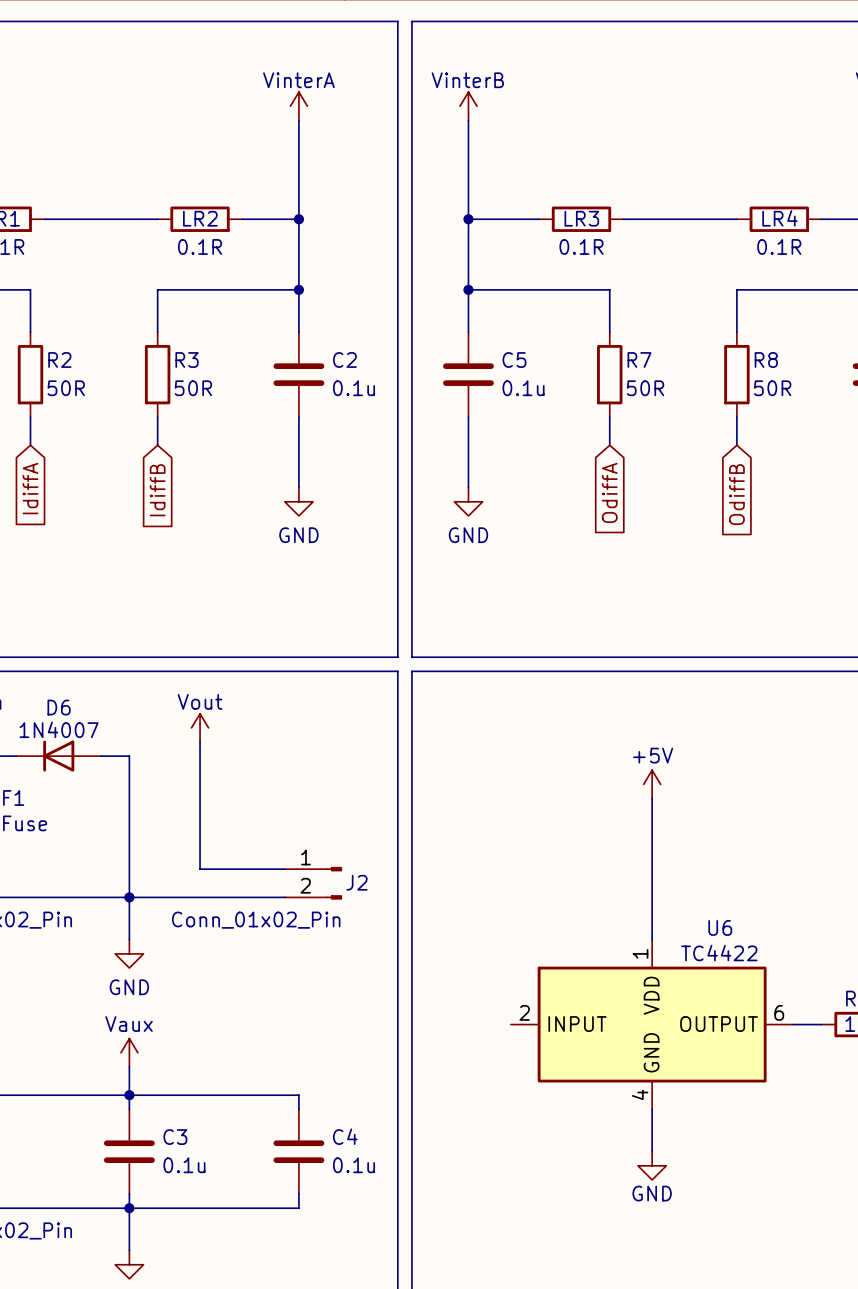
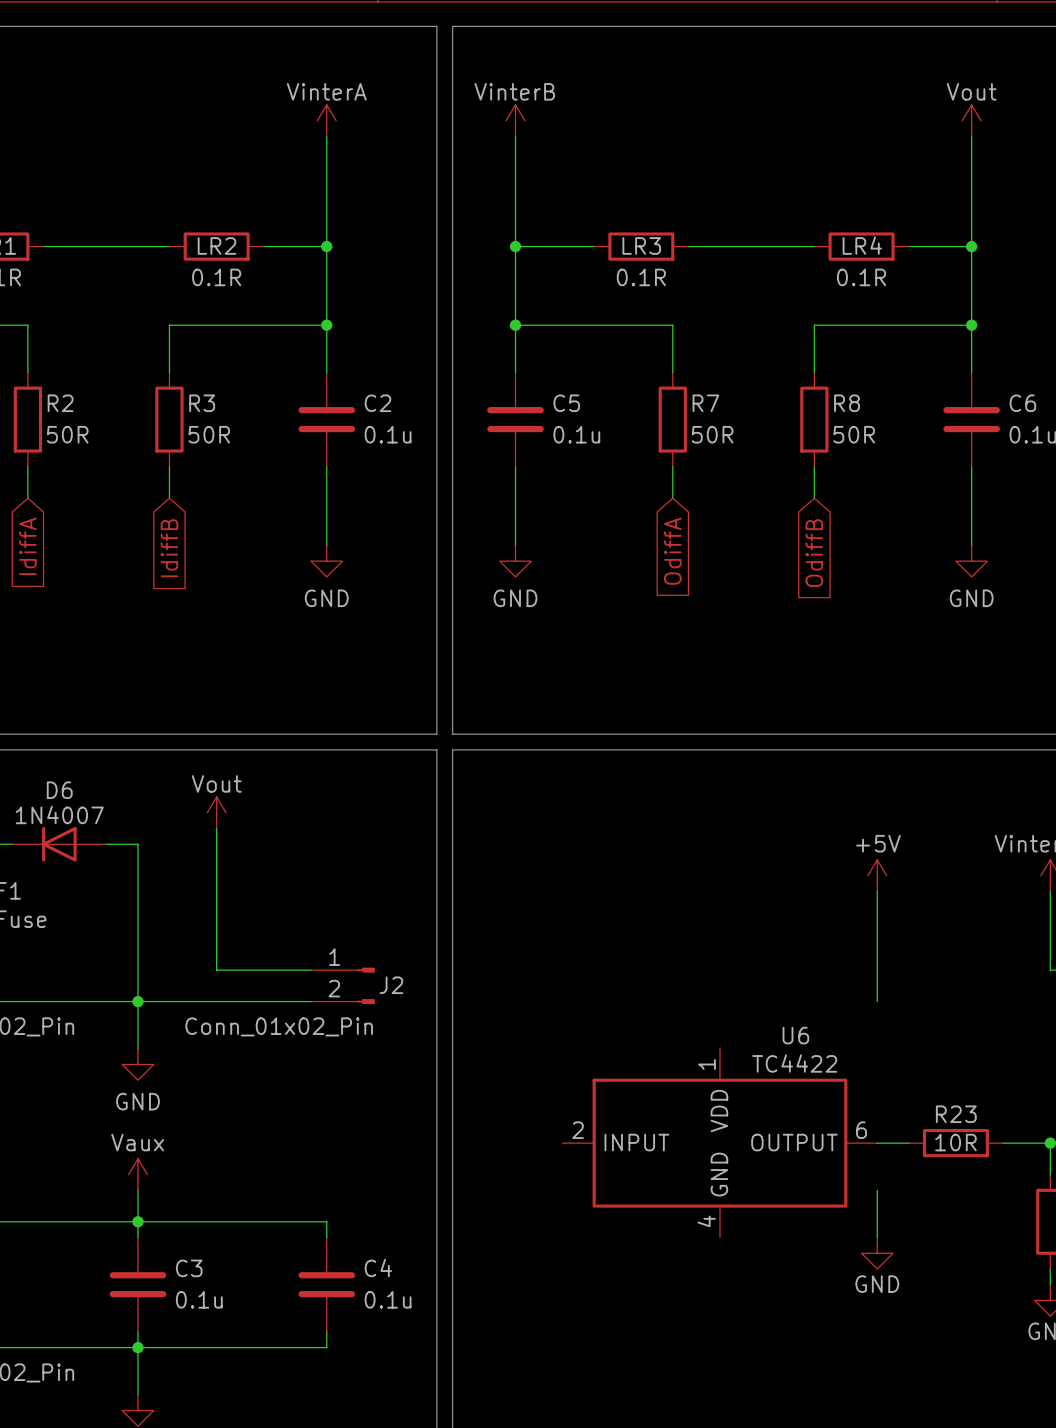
power symbol position: +5V (652, 784) -> +5V (877, 875)
wire: (652, 798) (652, 939) -> none
wire: none -> (877, 891) (877, 1001)
wire: (652, 1109) (652, 1151) -> (877, 1190) (877, 1237)
power symbol position: GND (652, 1165) -> GND (877, 1253)

